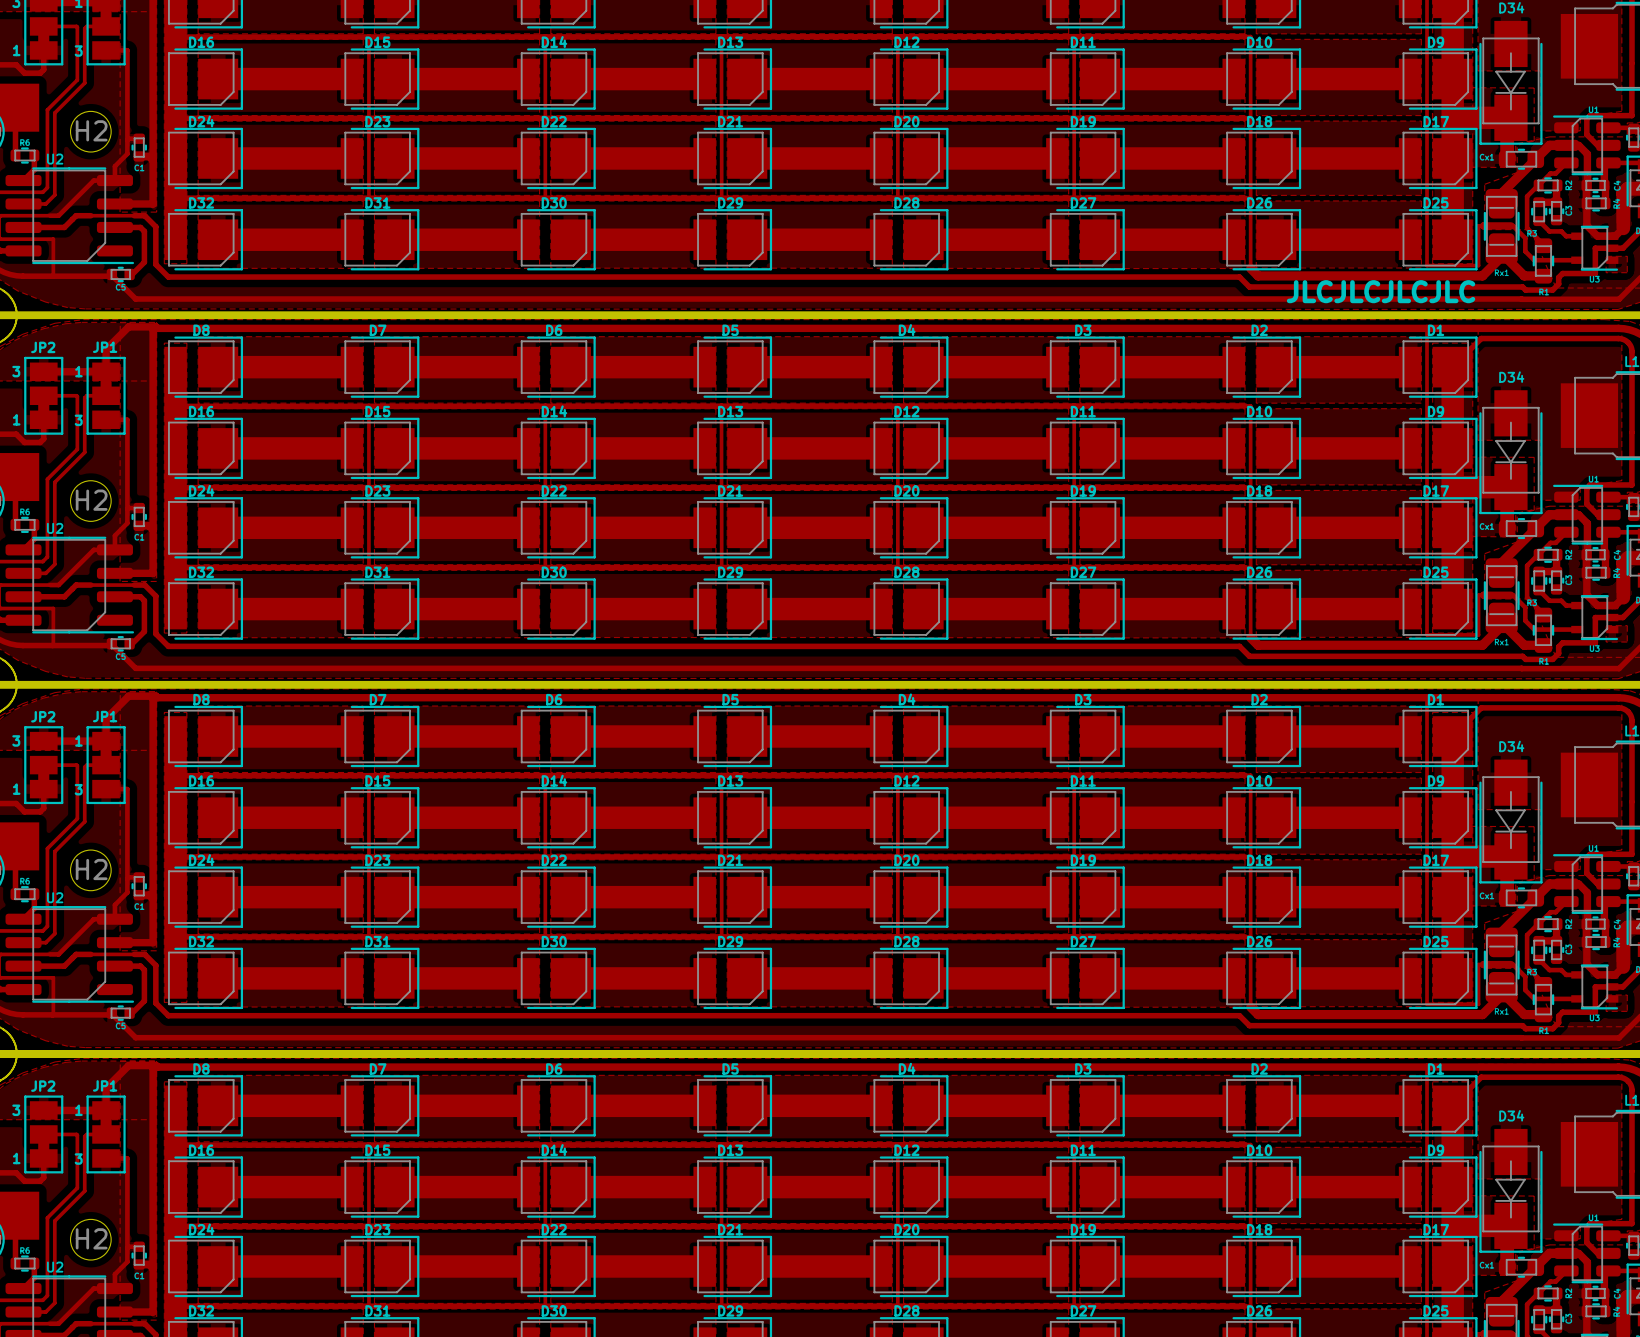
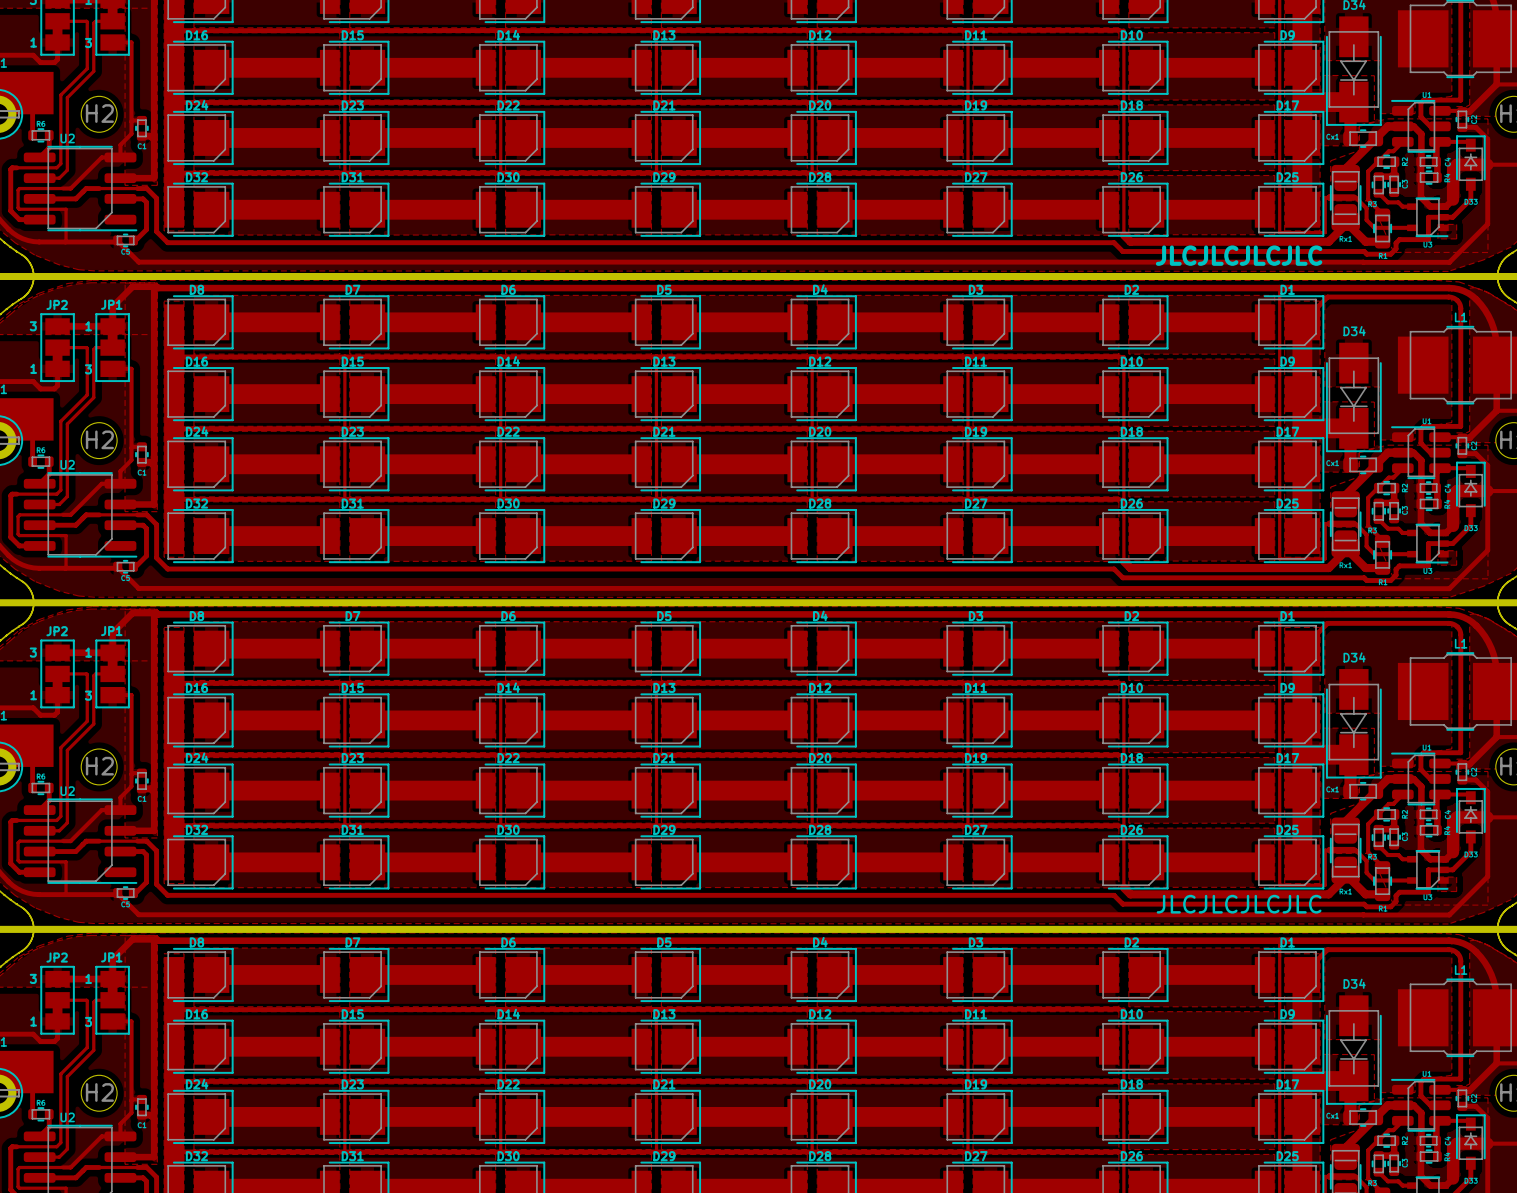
text: none -> JLCJLCJLCJLC (1239, 904)

